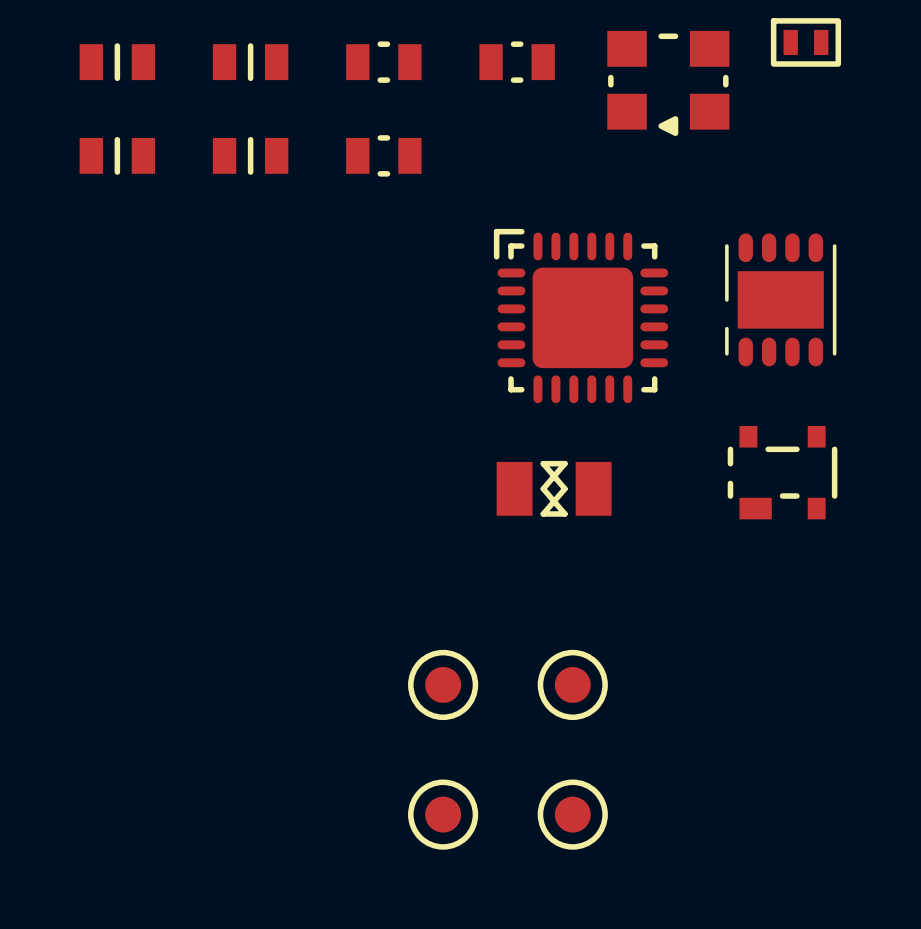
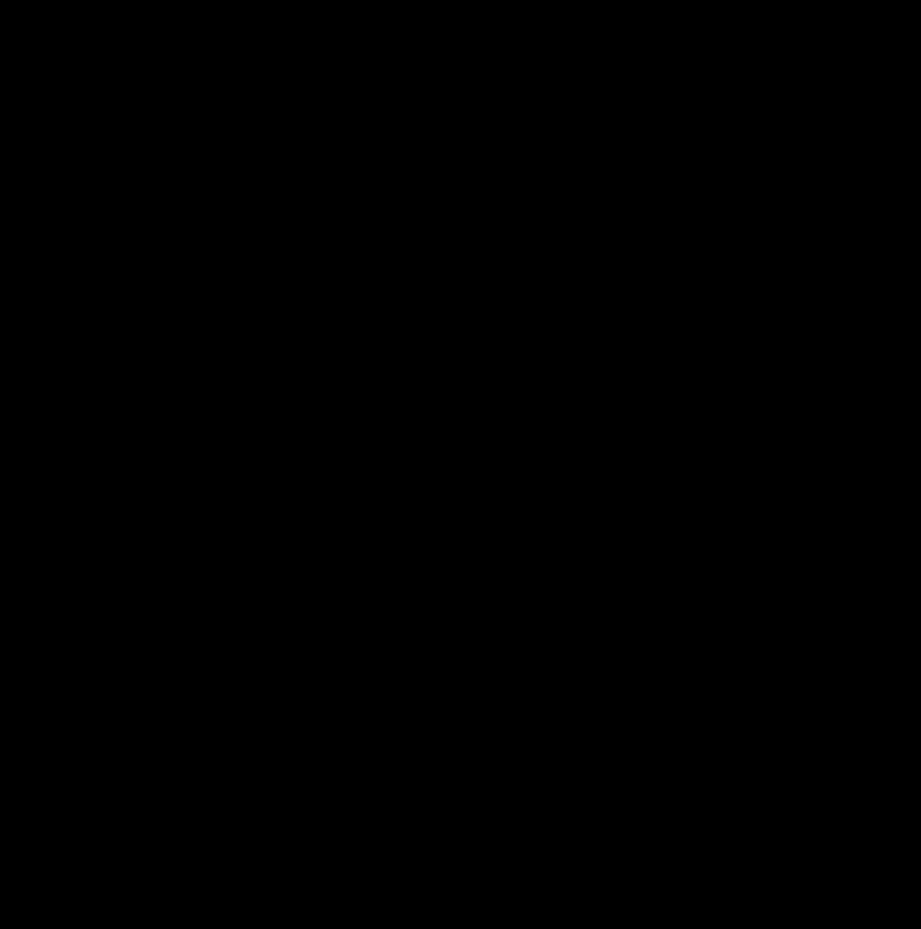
part: (805, 42) -> none
part: (117, 62) -> none
part: (250, 62) -> none
part: (383, 62) -> none
part: (517, 62) -> none
part: (668, 83) -> none
part: (117, 155) -> none
part: (250, 155) -> none
part: (383, 155) -> none
part: (780, 299) -> none
part: (581, 316) -> none
part: (782, 472) -> none
part: (554, 488) -> none
part: (443, 684) -> none
part: (572, 684) -> none
part: (443, 814) -> none
part: (572, 814) -> none

